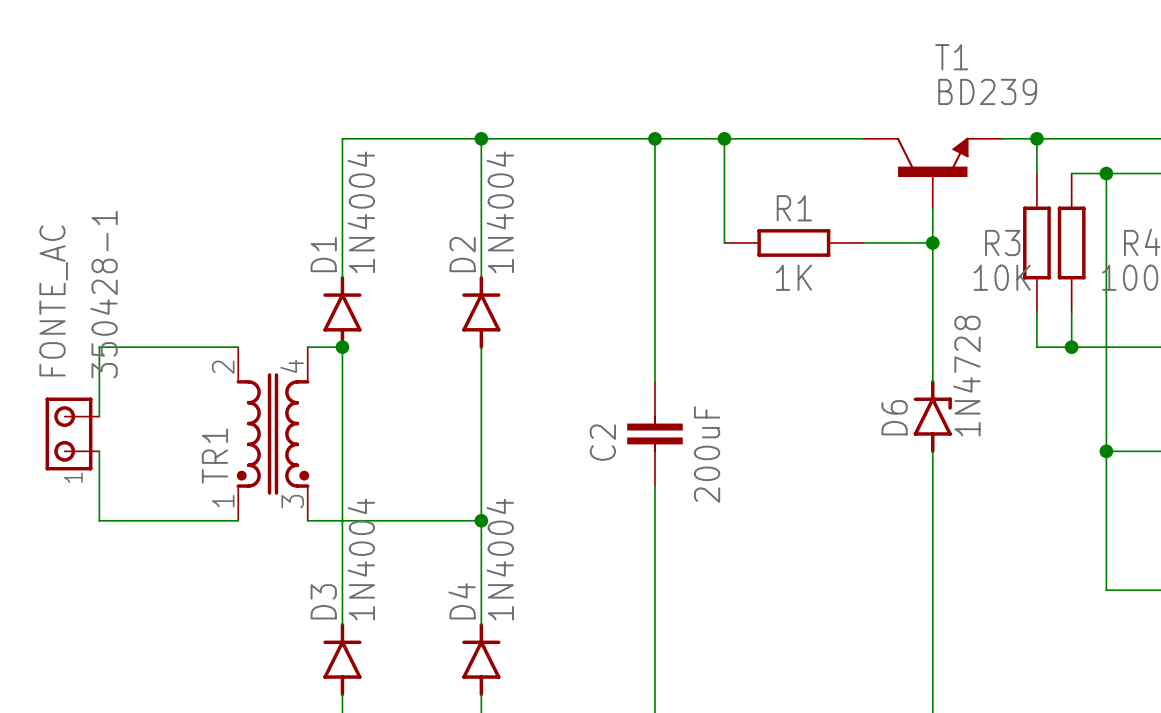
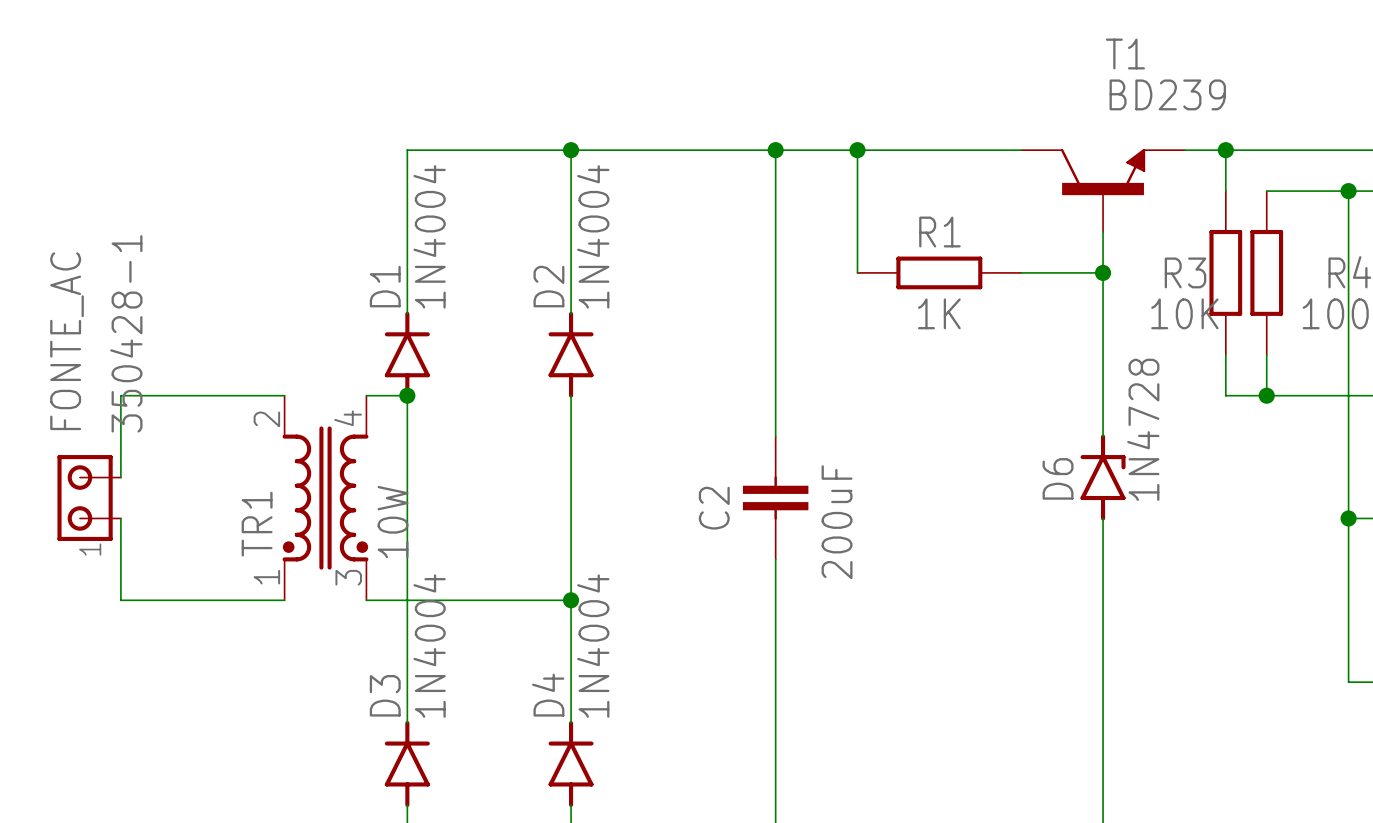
wire: (1106, 173) (1106, 590) (1141, 590) -> (1348, 191) (1348, 682)
junction position: (1106, 173) -> (1348, 191)
wire: (1106, 451) (1141, 451) -> none
junction position: (1106, 451) -> (1348, 518)
TR1 value: none -> 10W (393, 522)

